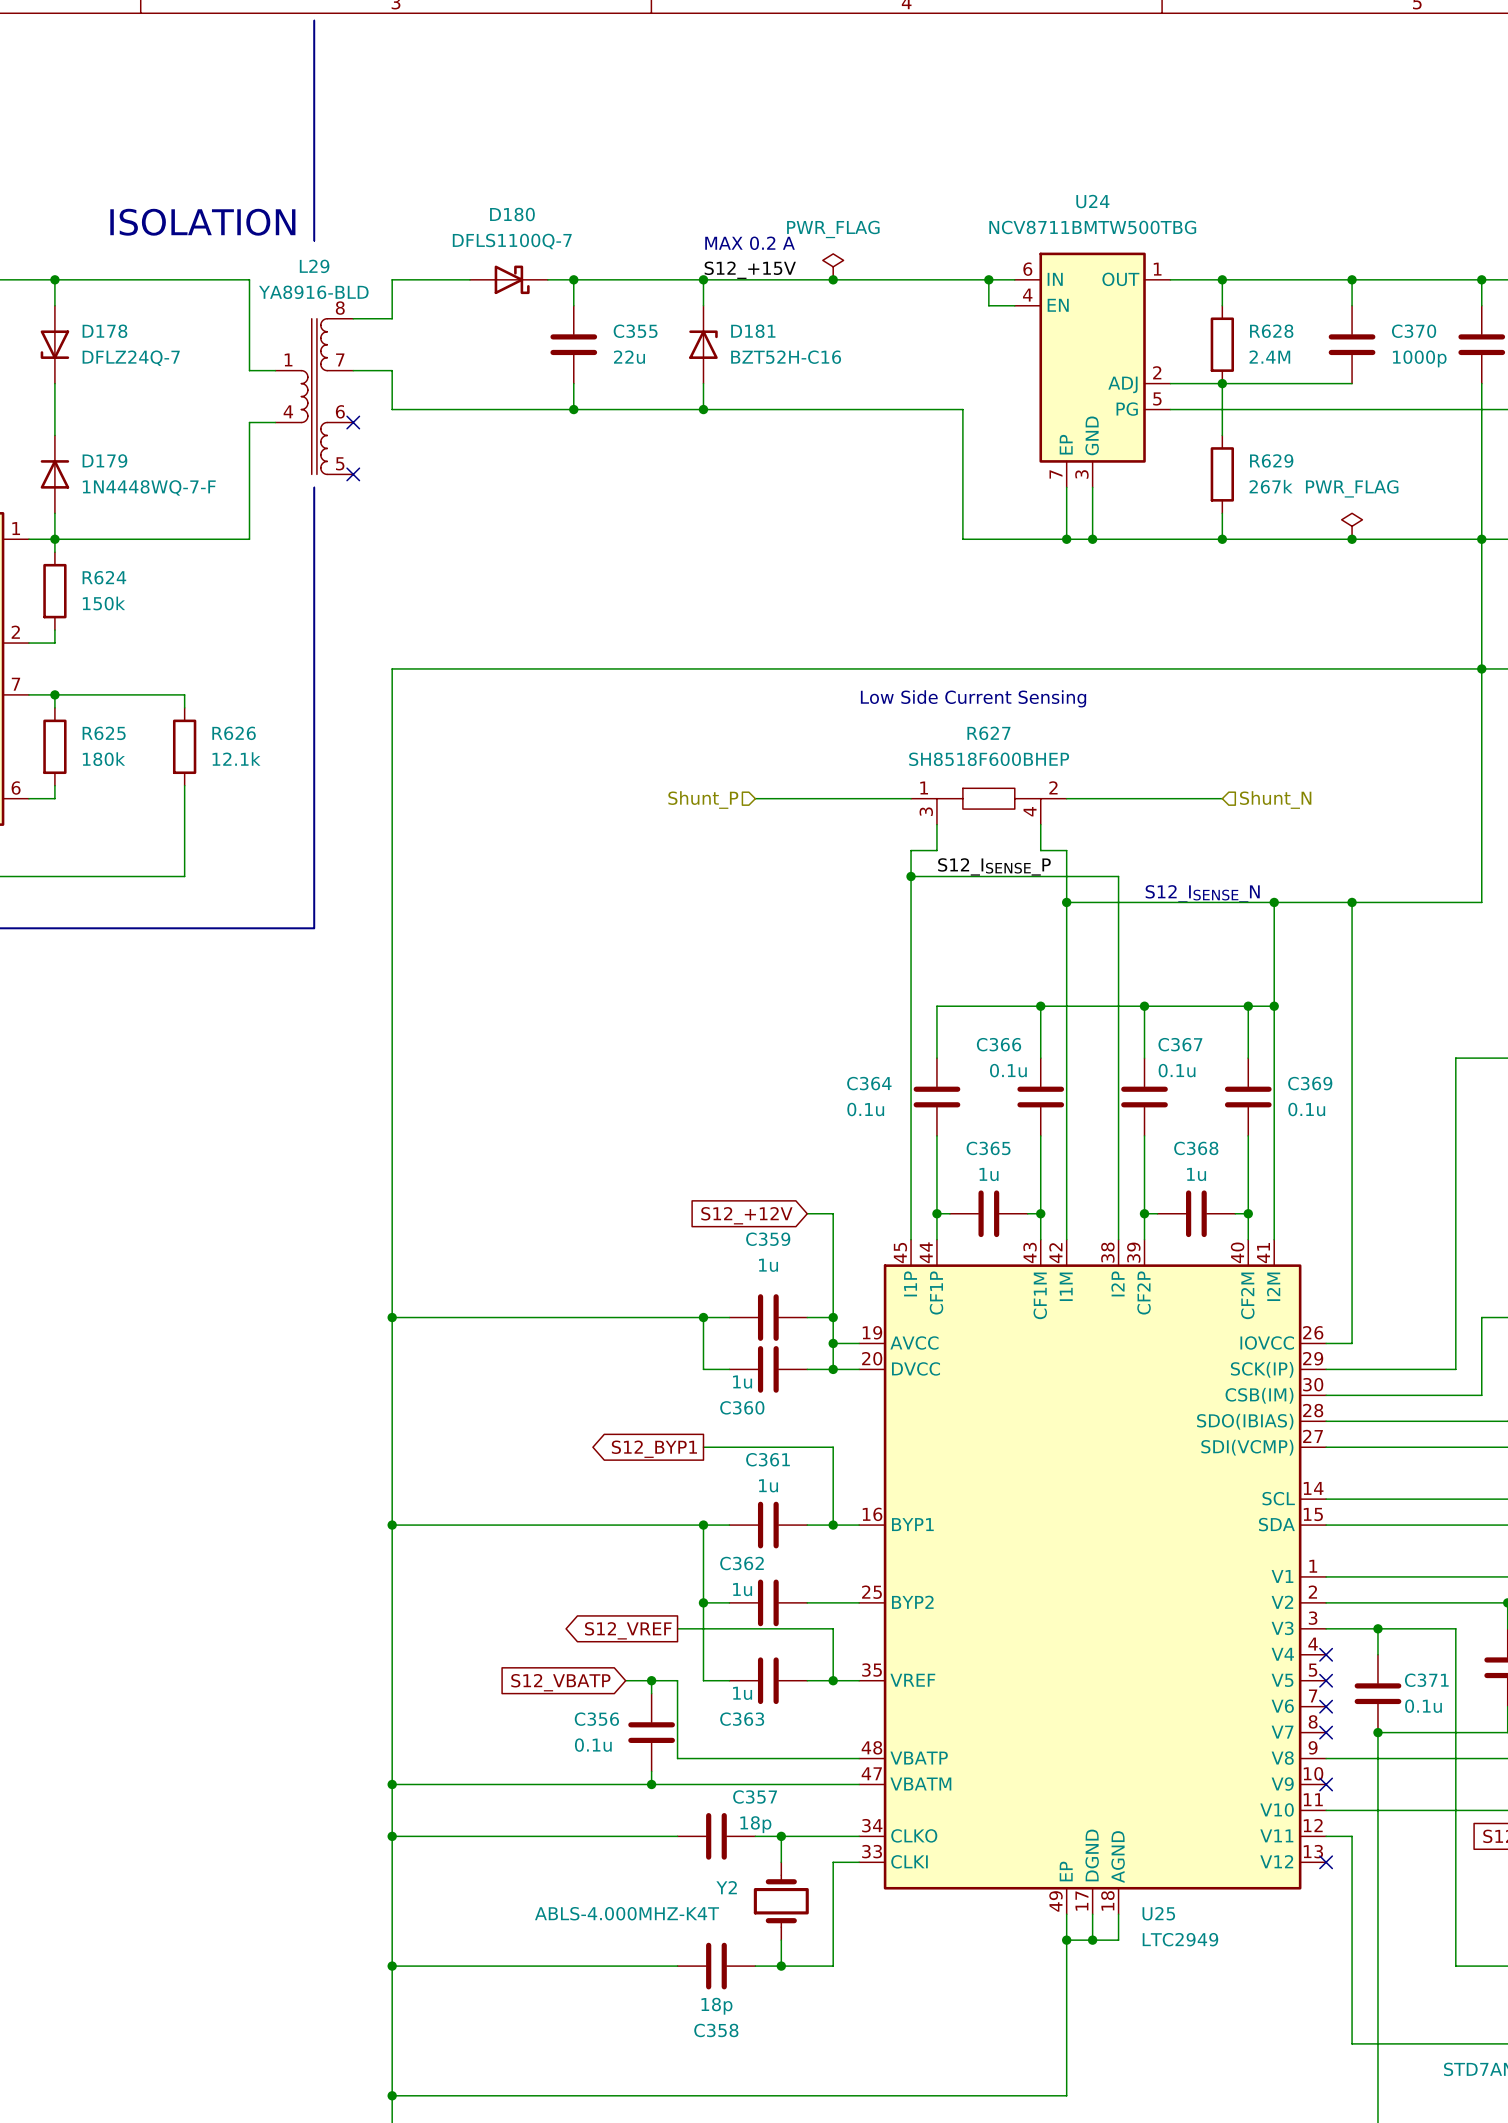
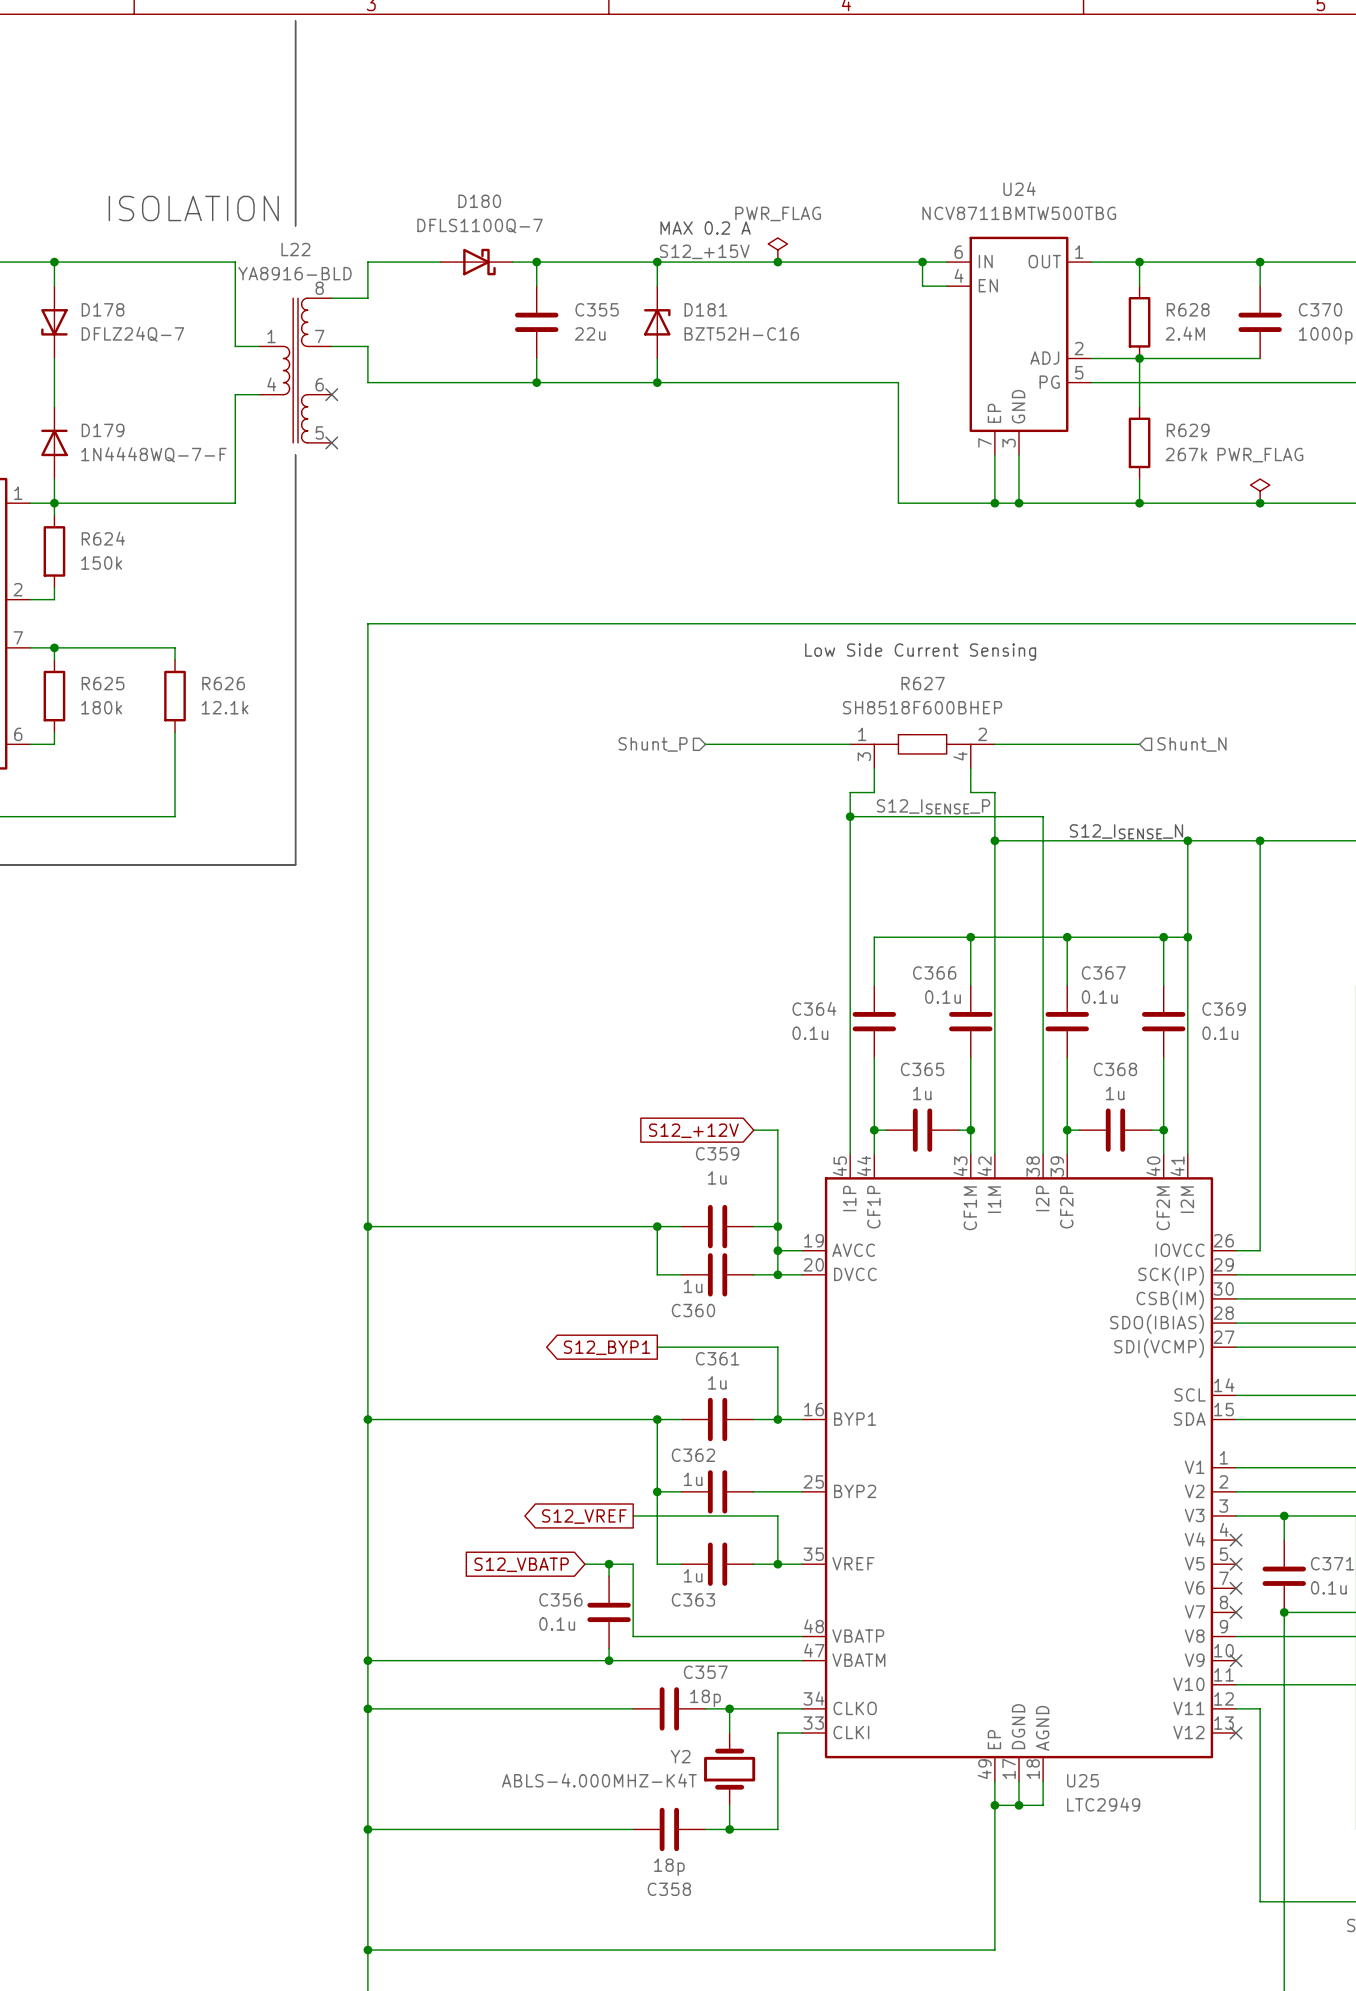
L29 name: L29 (314, 266) -> L22 (295, 249)

